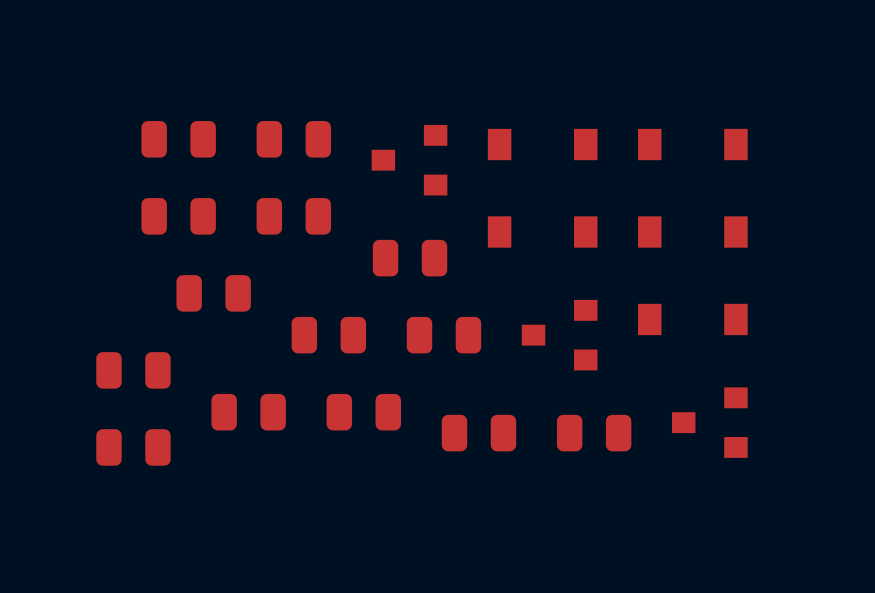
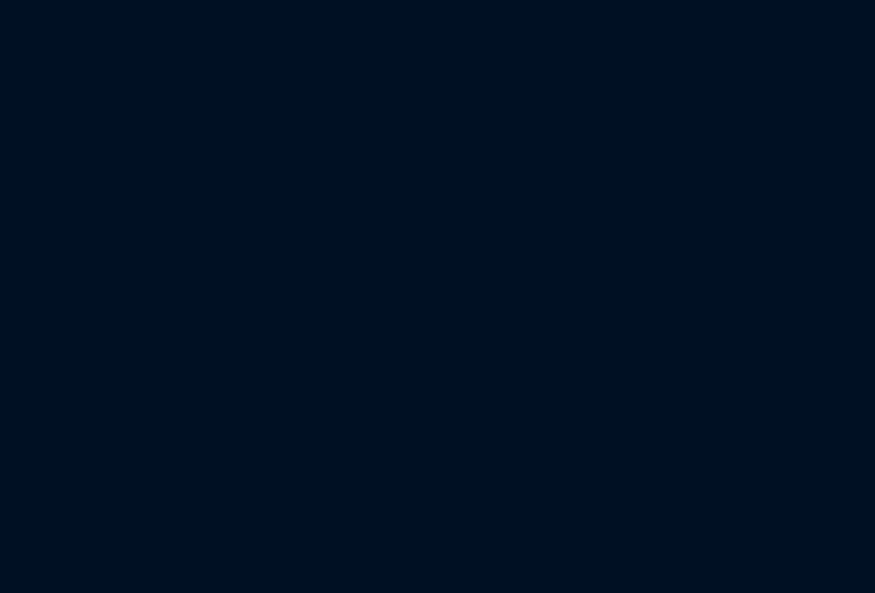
part: (178, 139) -> none
part: (293, 139) -> none
part: (542, 144) -> none
part: (692, 144) -> none
part: (409, 160) -> none
part: (178, 216) -> none
part: (293, 216) -> none
part: (542, 232) -> none
part: (692, 232) -> none
part: (410, 258) -> none
part: (213, 293) -> none
part: (692, 319) -> none
part: (328, 335) -> none
part: (443, 335) -> none
part: (559, 335) -> none
part: (133, 370) -> none
part: (248, 412) -> none
part: (363, 412) -> none
part: (709, 422) -> none
part: (478, 433) -> none
part: (594, 433) -> none
part: (133, 447) -> none

